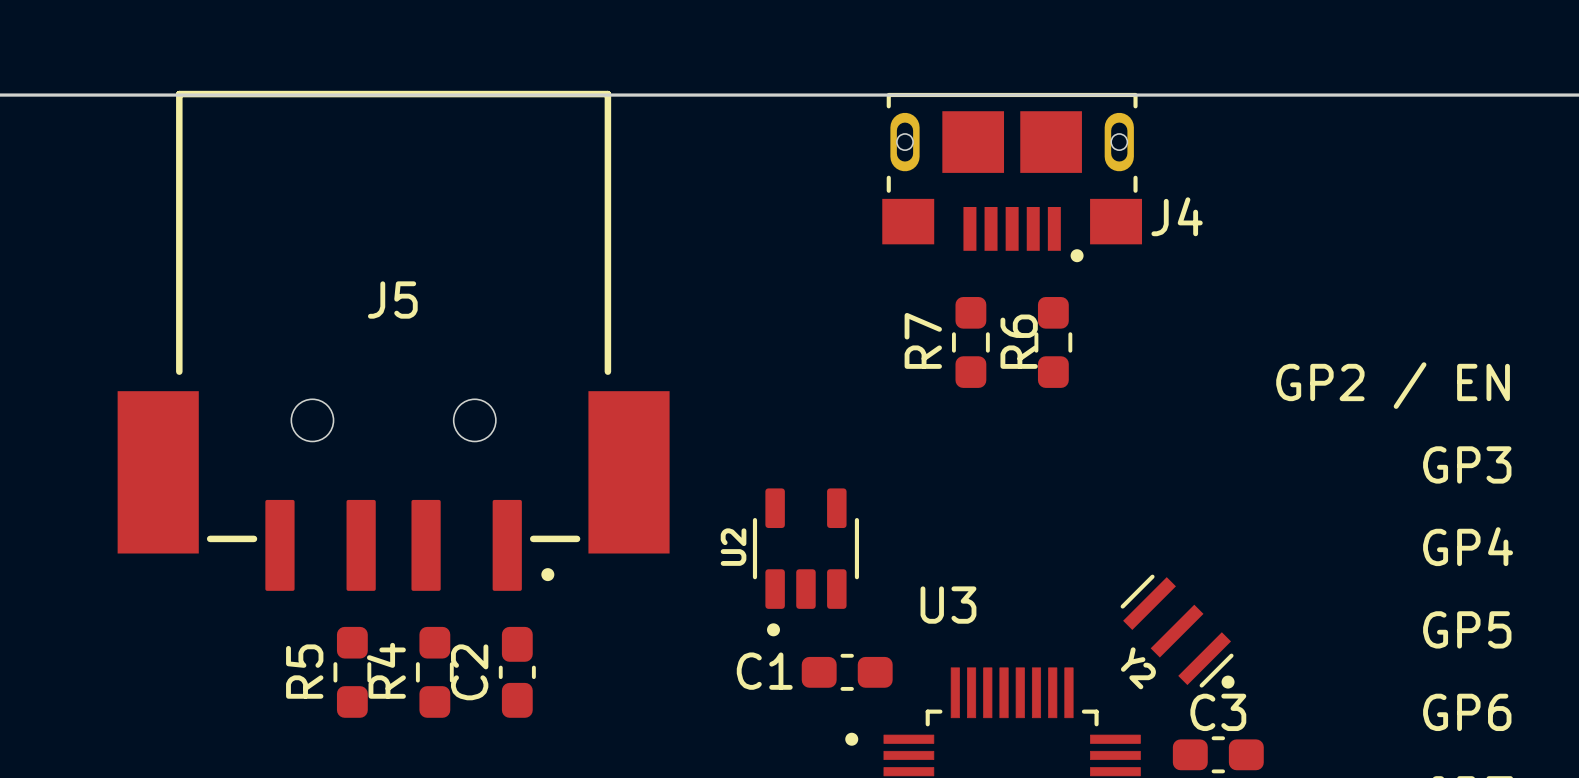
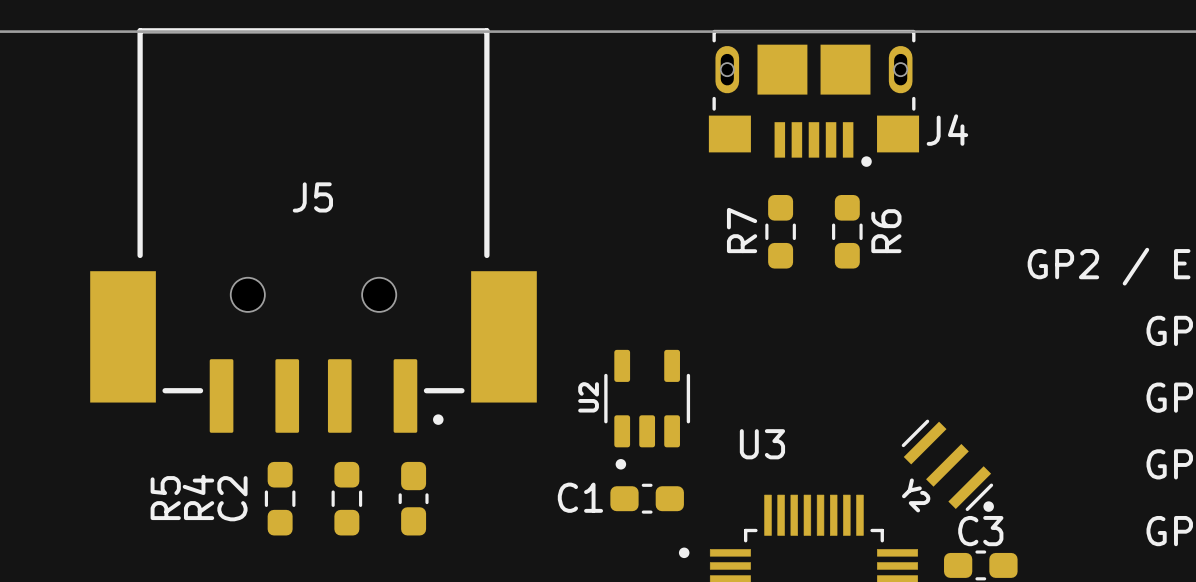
R6 name position: R6 (1019, 341) -> R6 (886, 231)
R4 name position: R4 (386, 670) -> R4 (198, 497)
R5 name position: R5 (304, 671) -> R5 (165, 498)
C2 name position: C2 (469, 672) -> C2 (232, 498)
C1 position: (847, 672) -> (647, 498)

